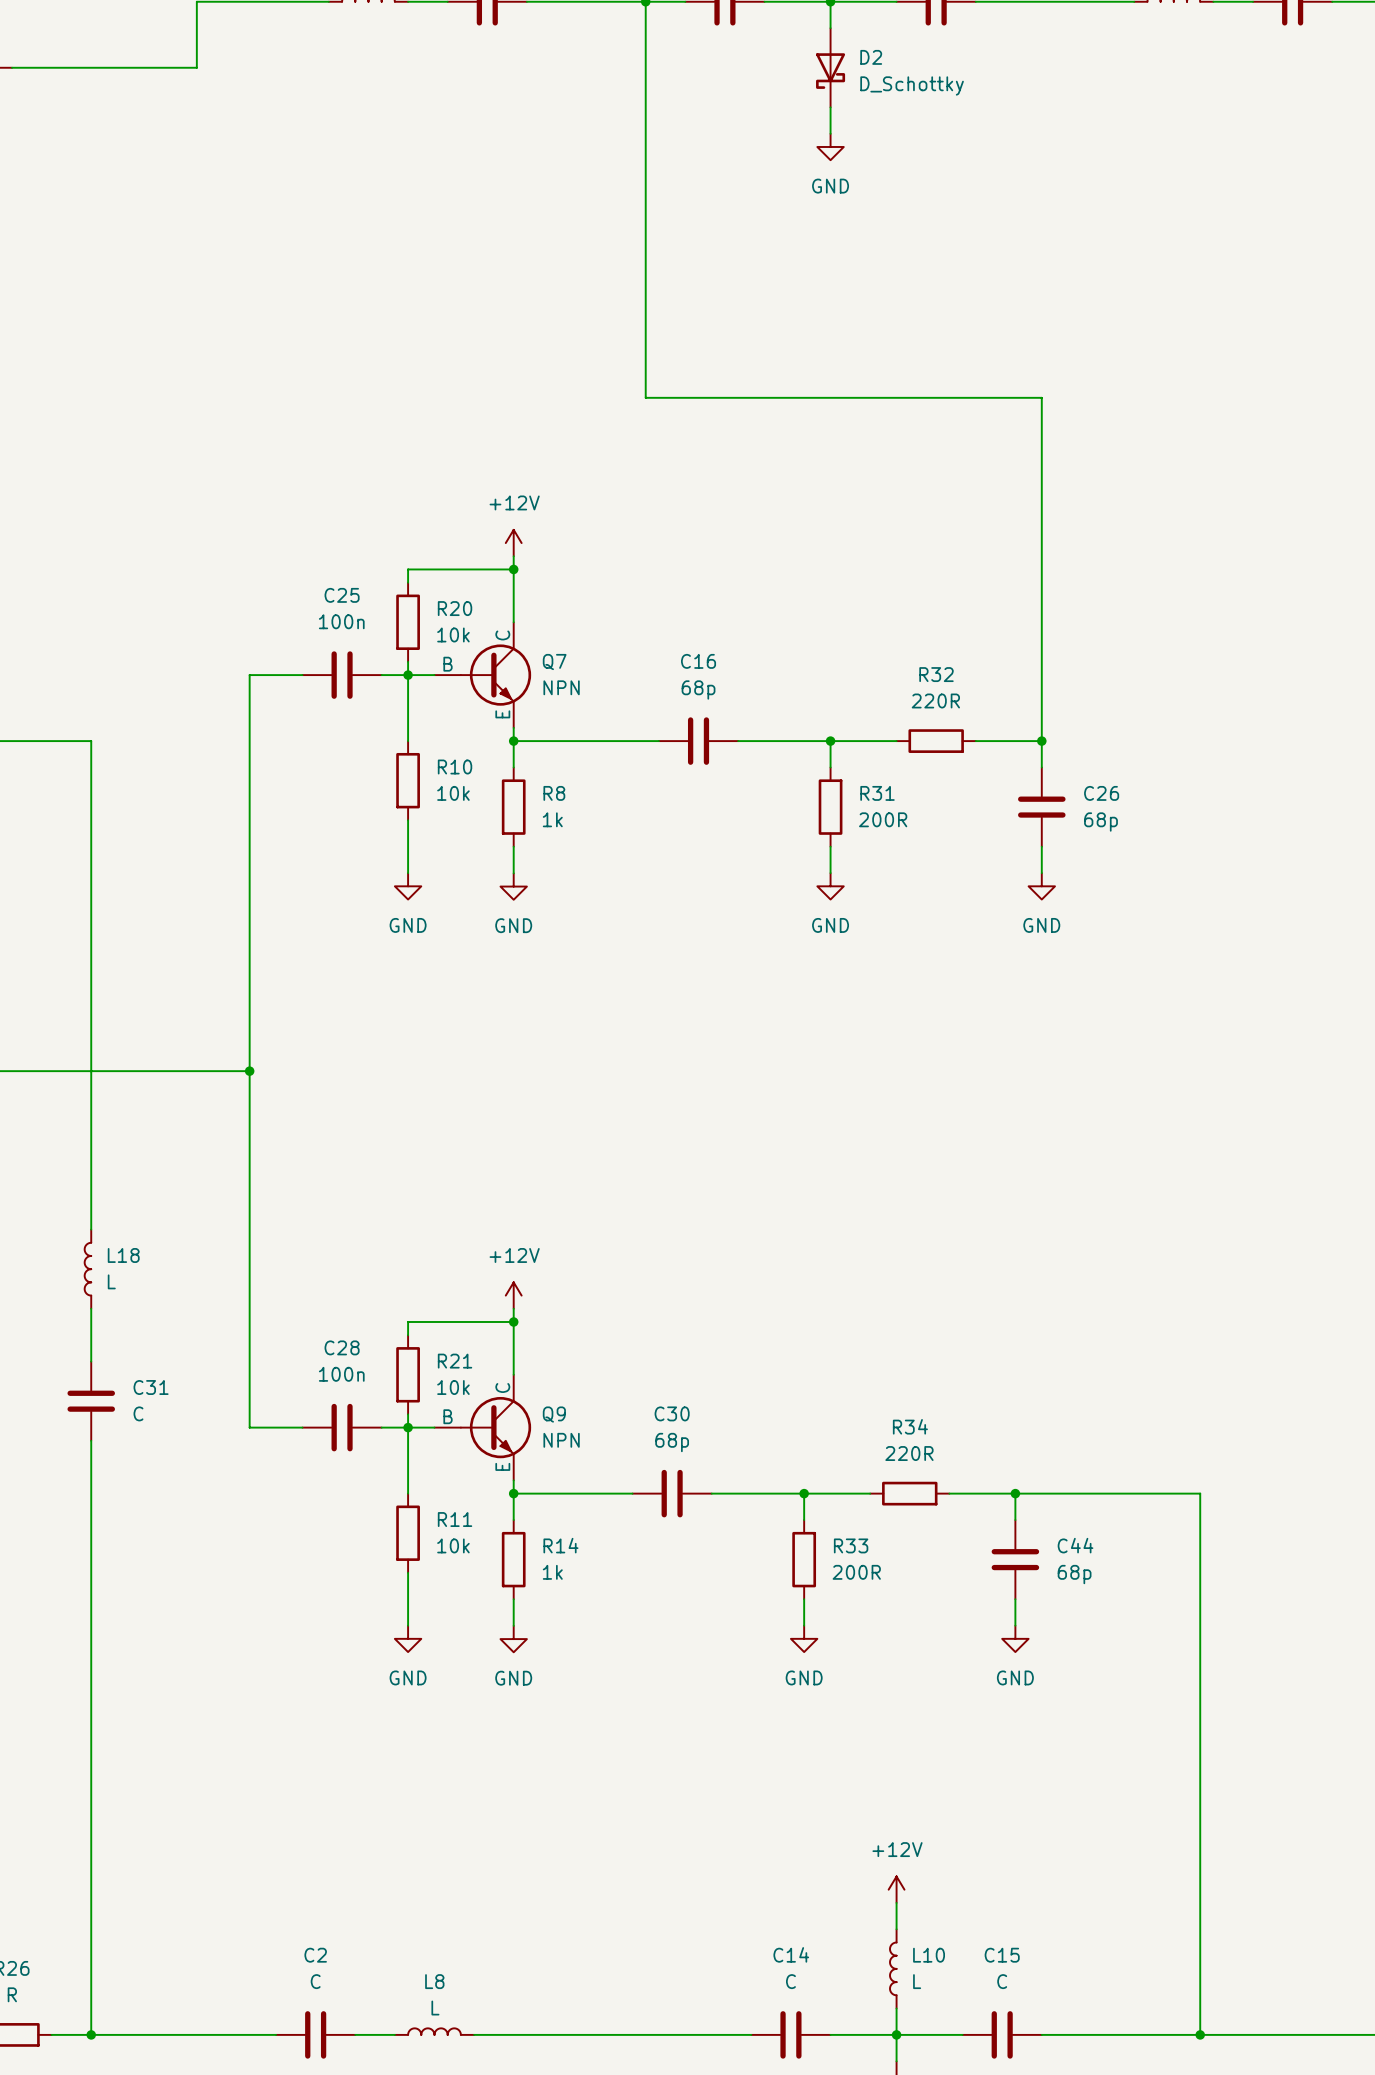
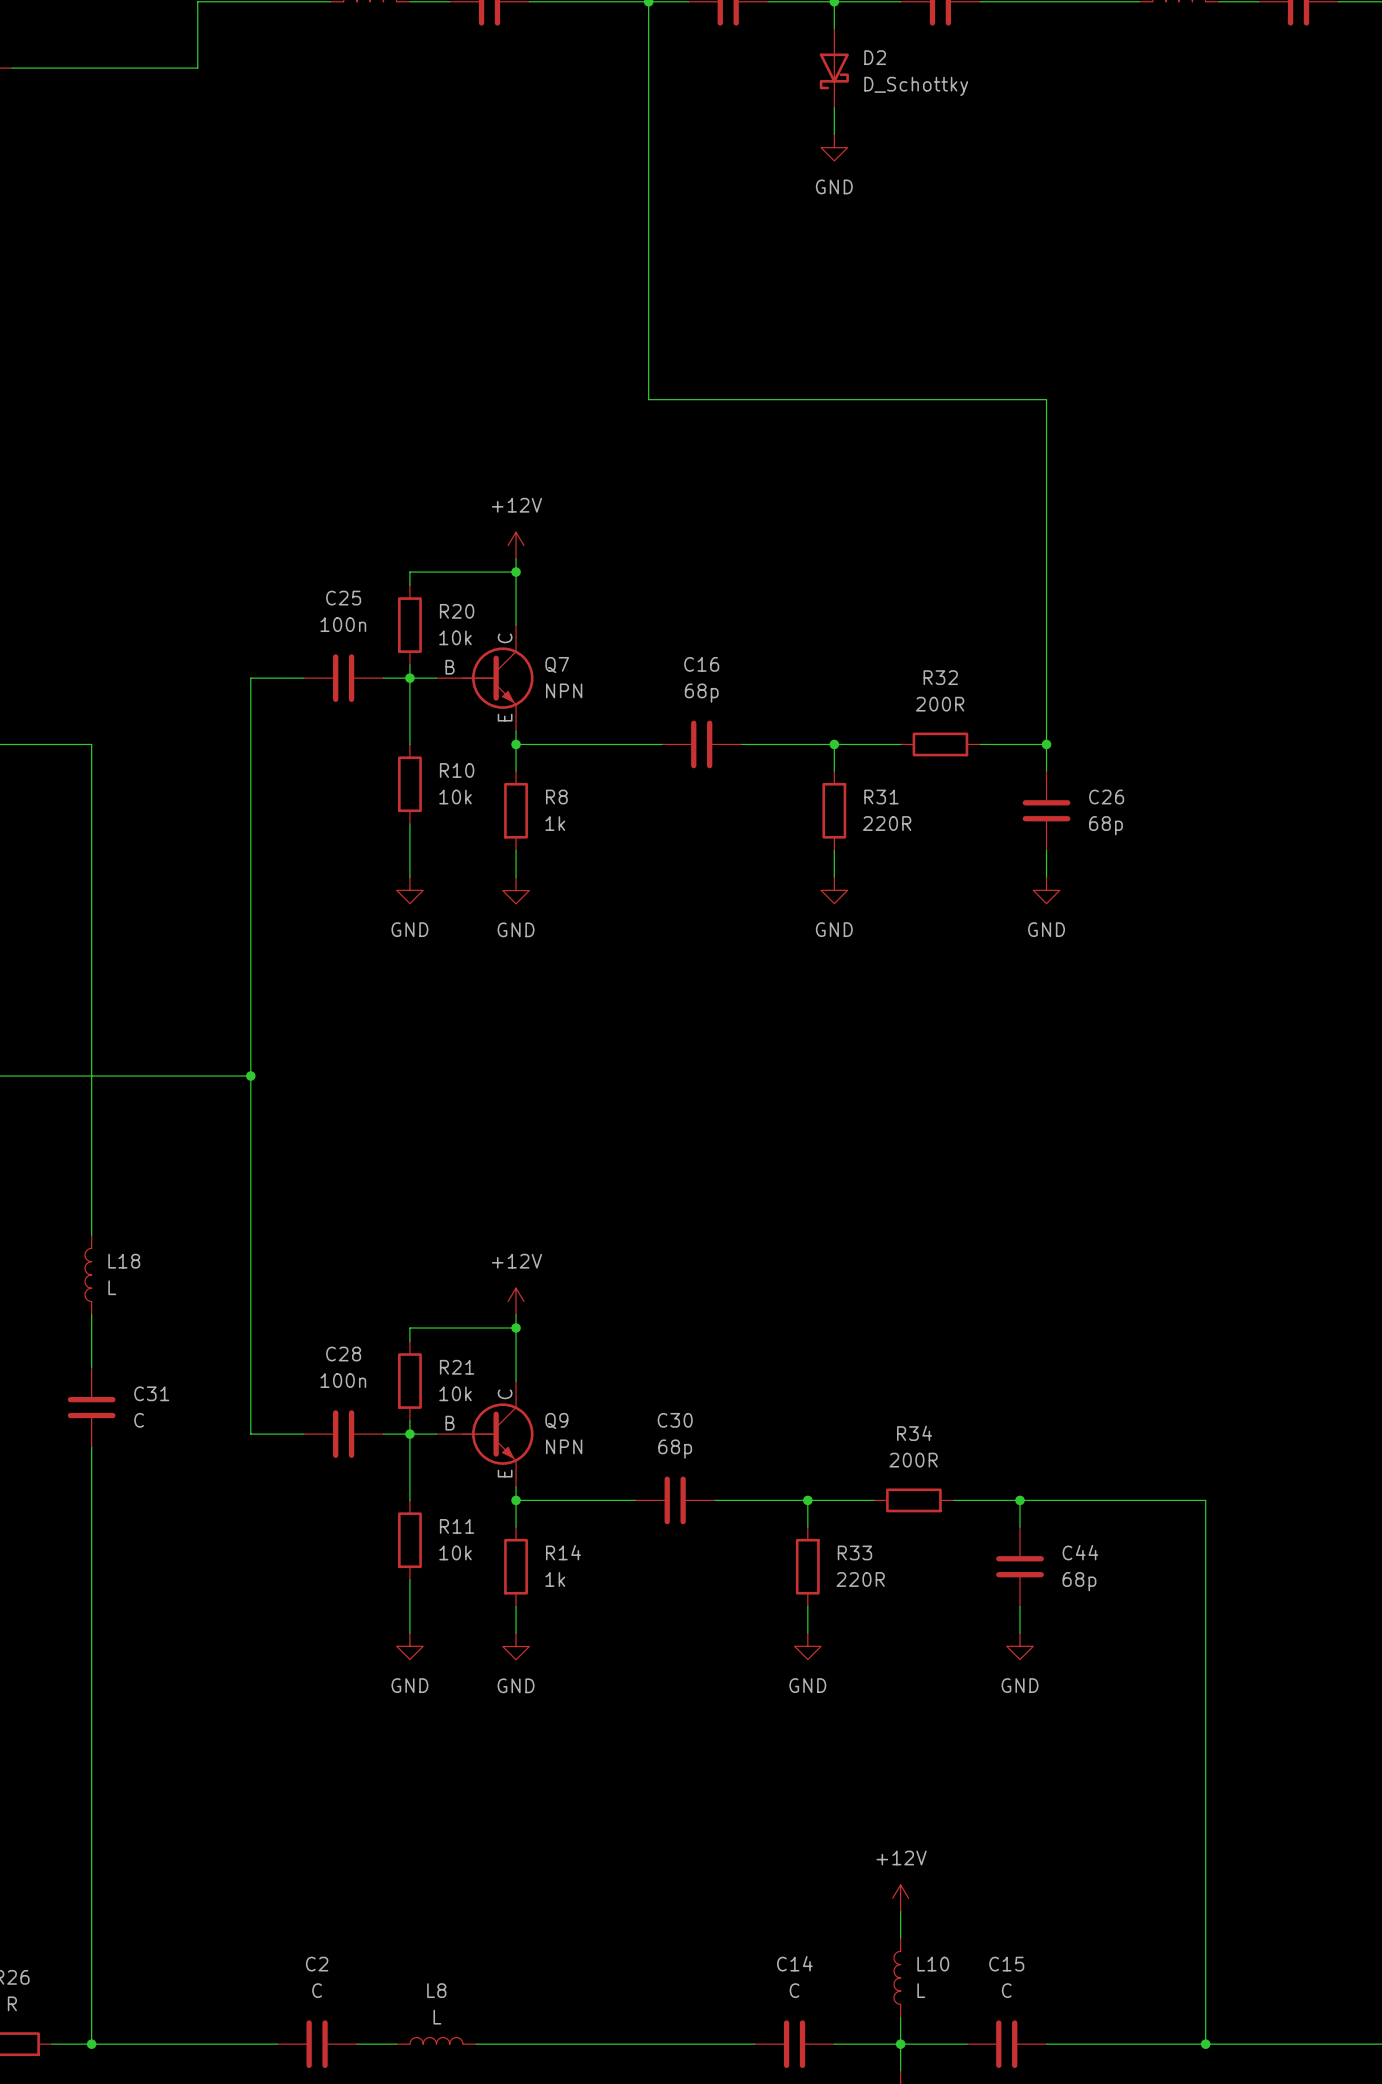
R32 value: 220R (935, 700) -> 200R (940, 704)
R31 value: 200R (883, 819) -> 220R (887, 823)
R34 value: 220R (909, 1453) -> 200R (913, 1460)
R33 value: 200R (856, 1572) -> 220R (860, 1579)

